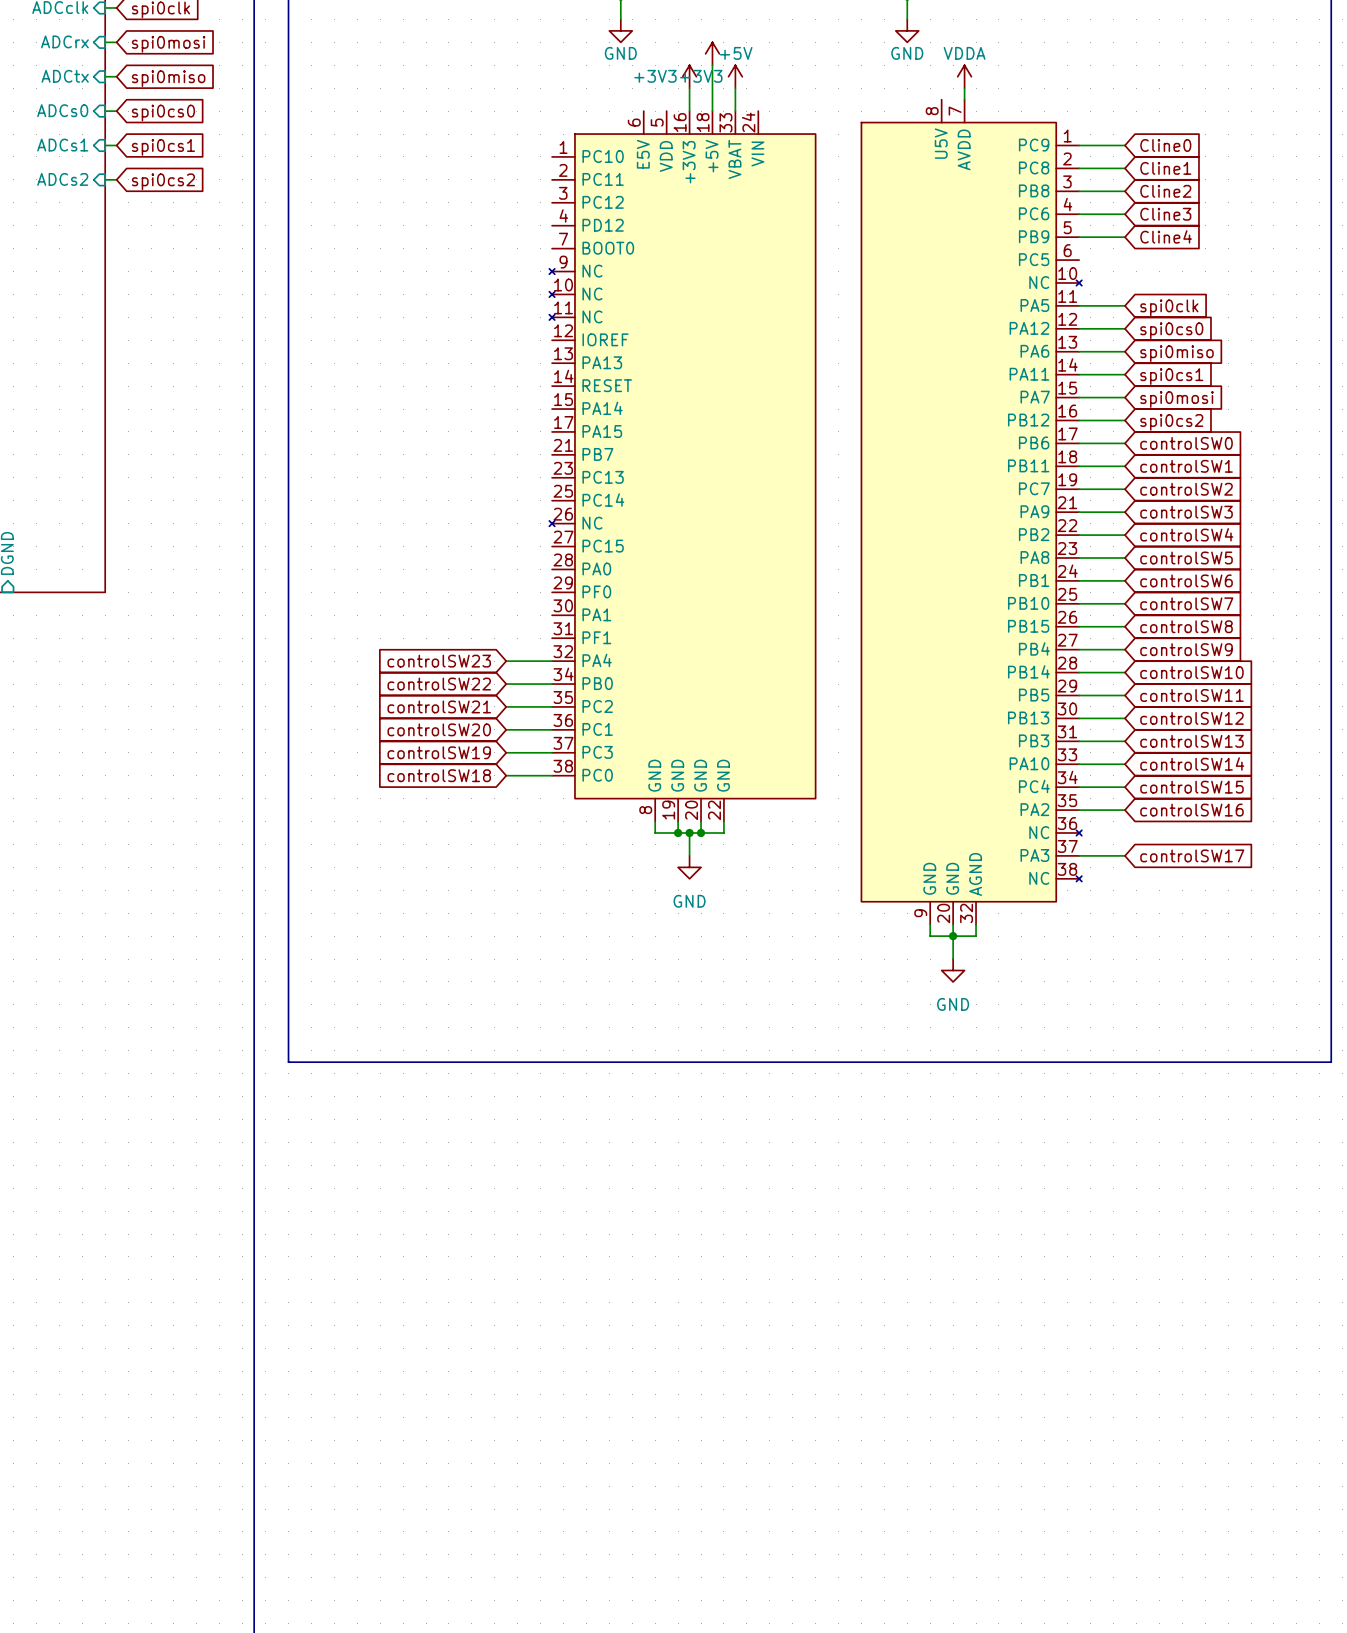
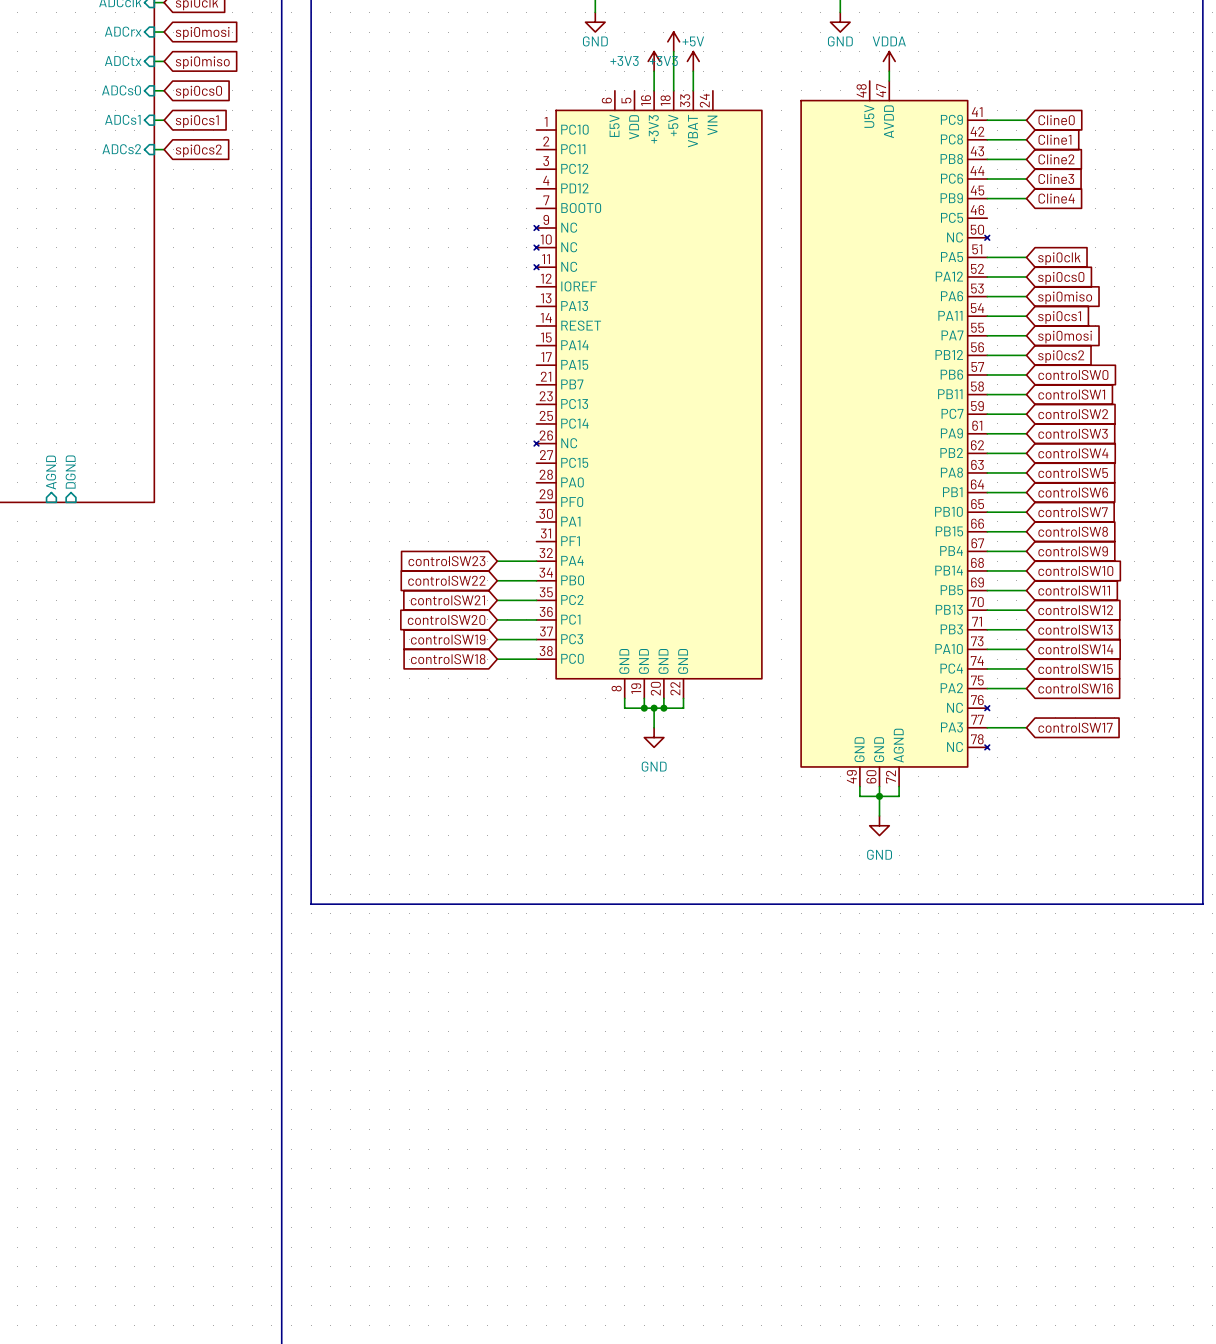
part symbol: [861, 99, 1082, 925] -> [801, 81, 990, 787]

